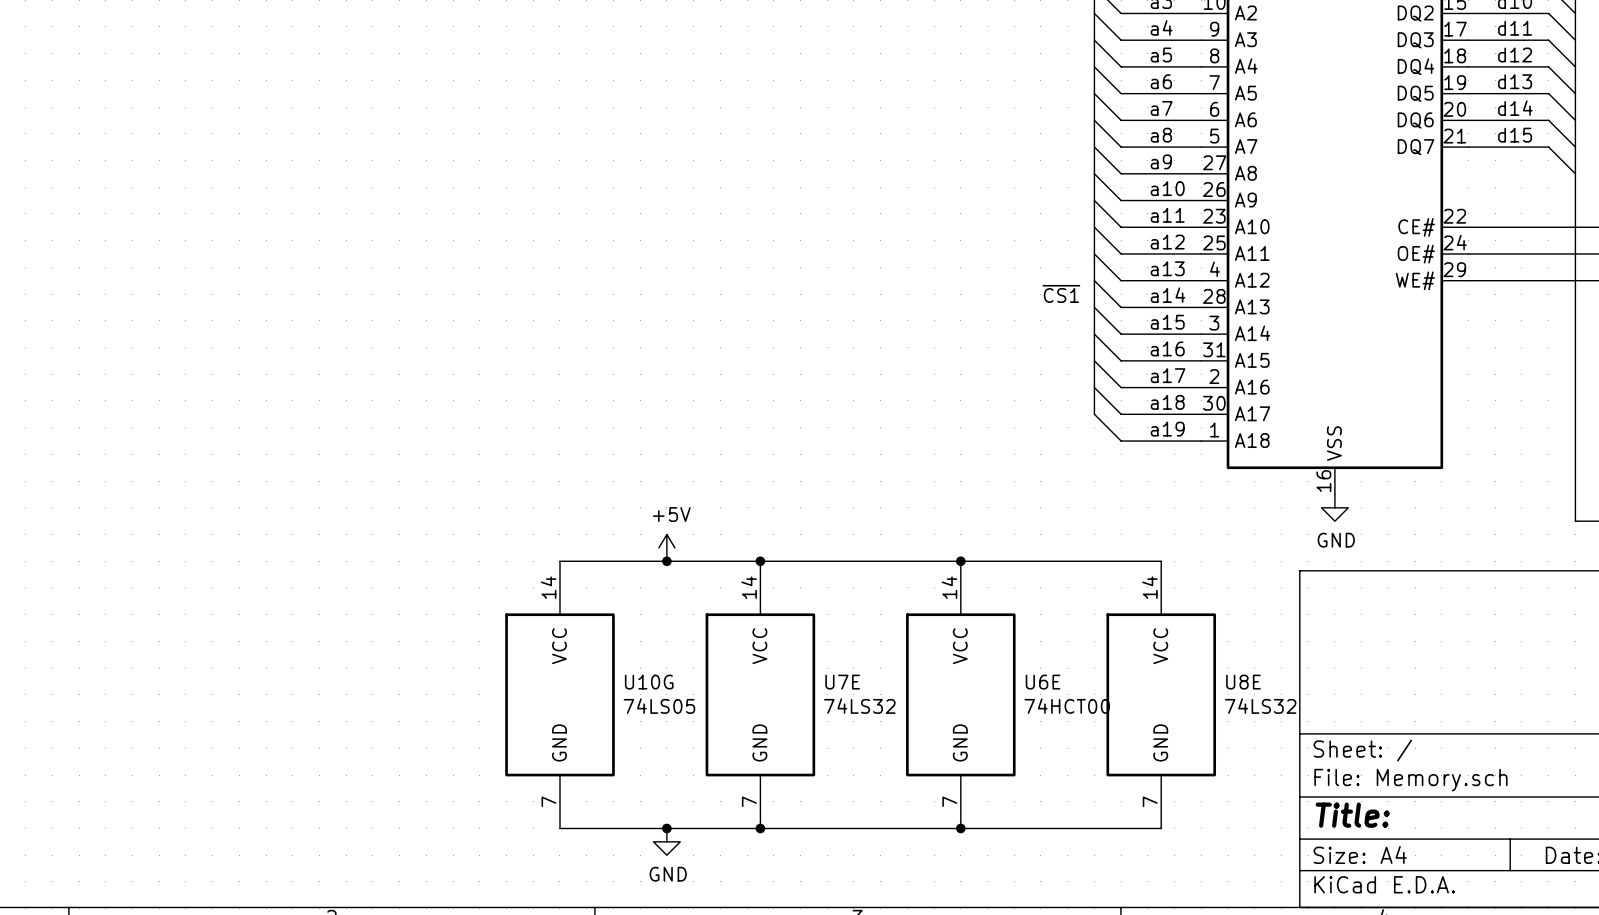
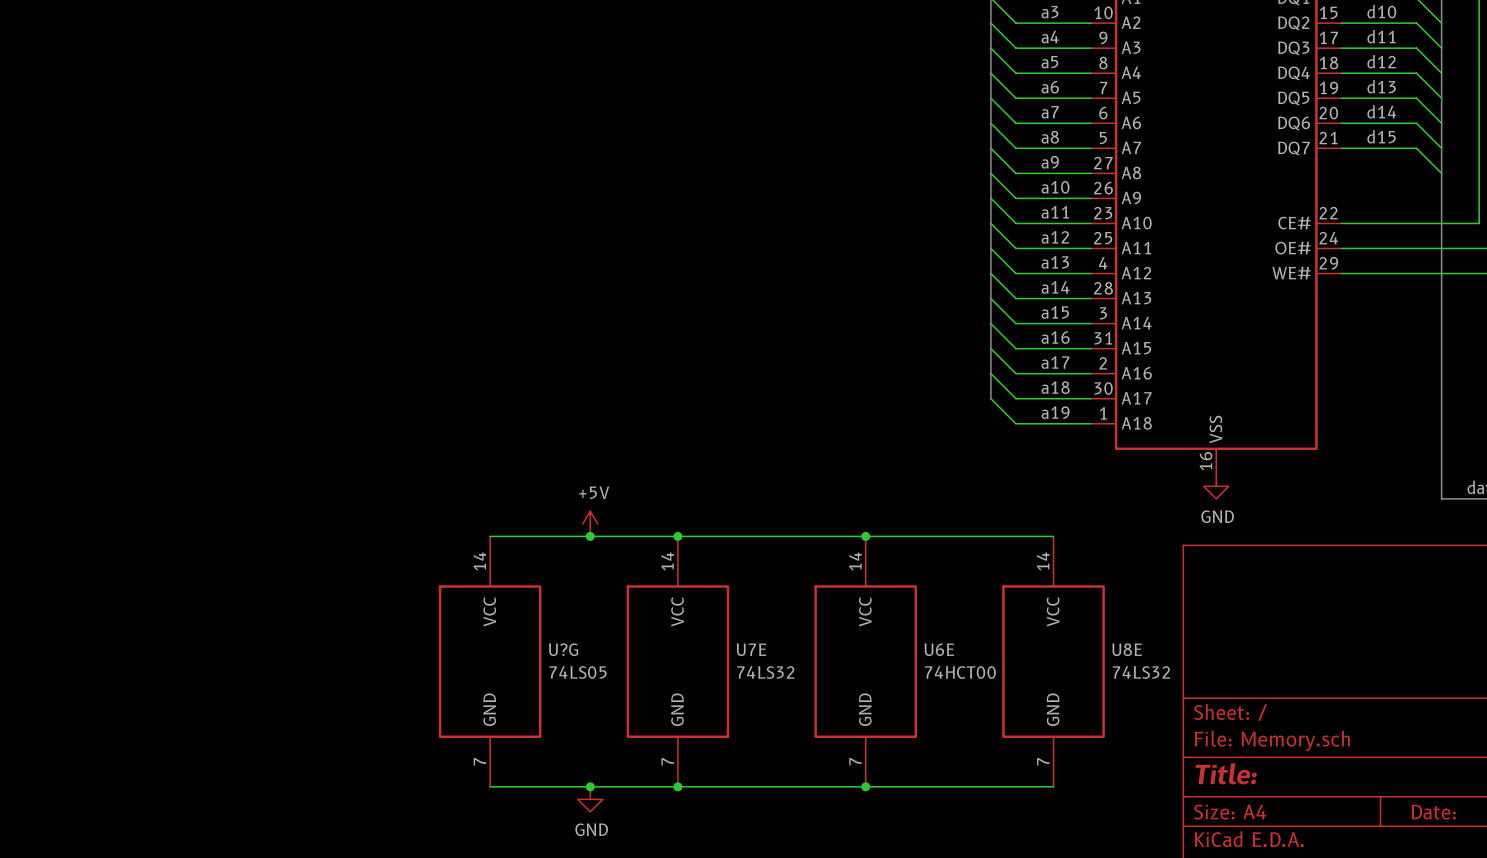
label: ~{CS1} (1061, 293) -> none
U10G name: U10G (649, 682) -> U?G (563, 649)

